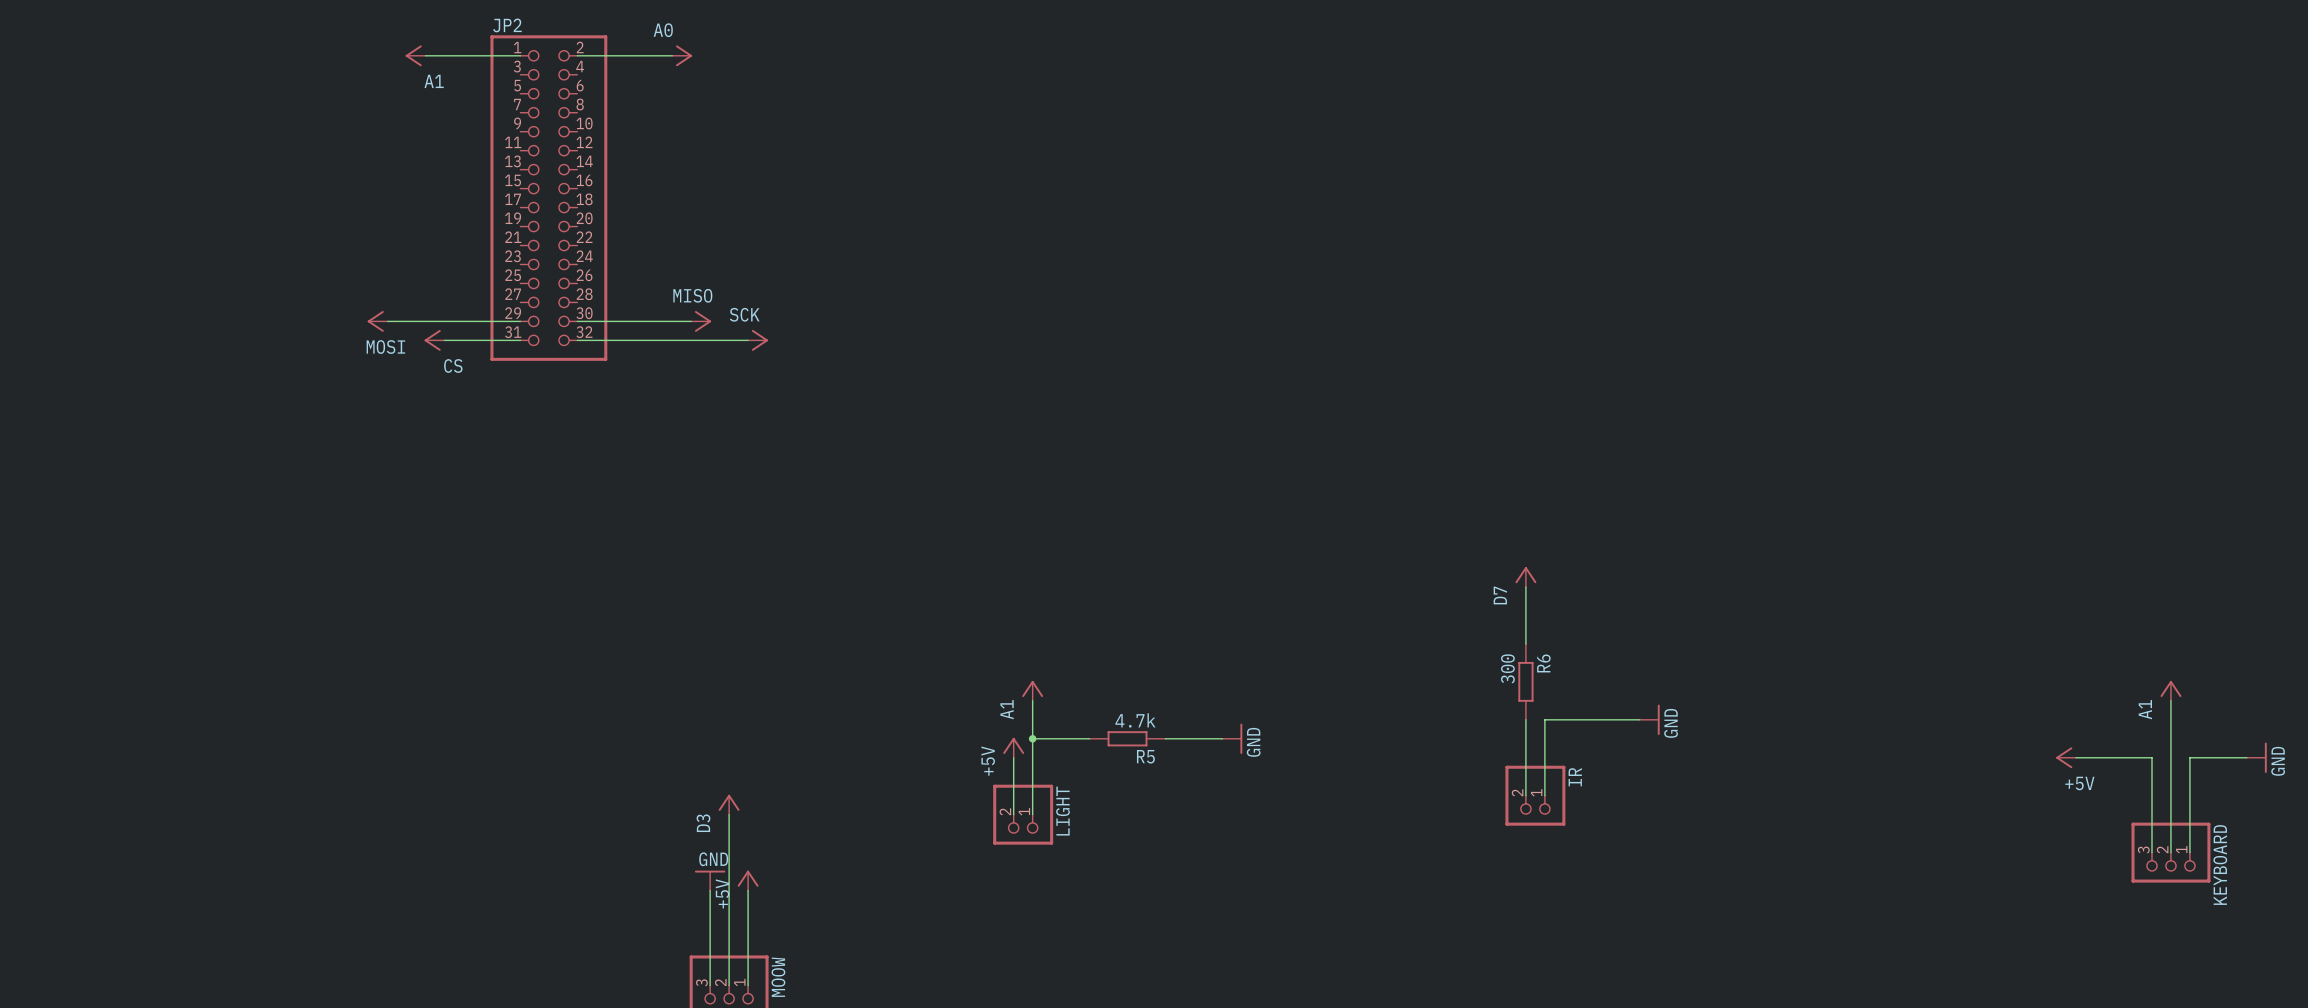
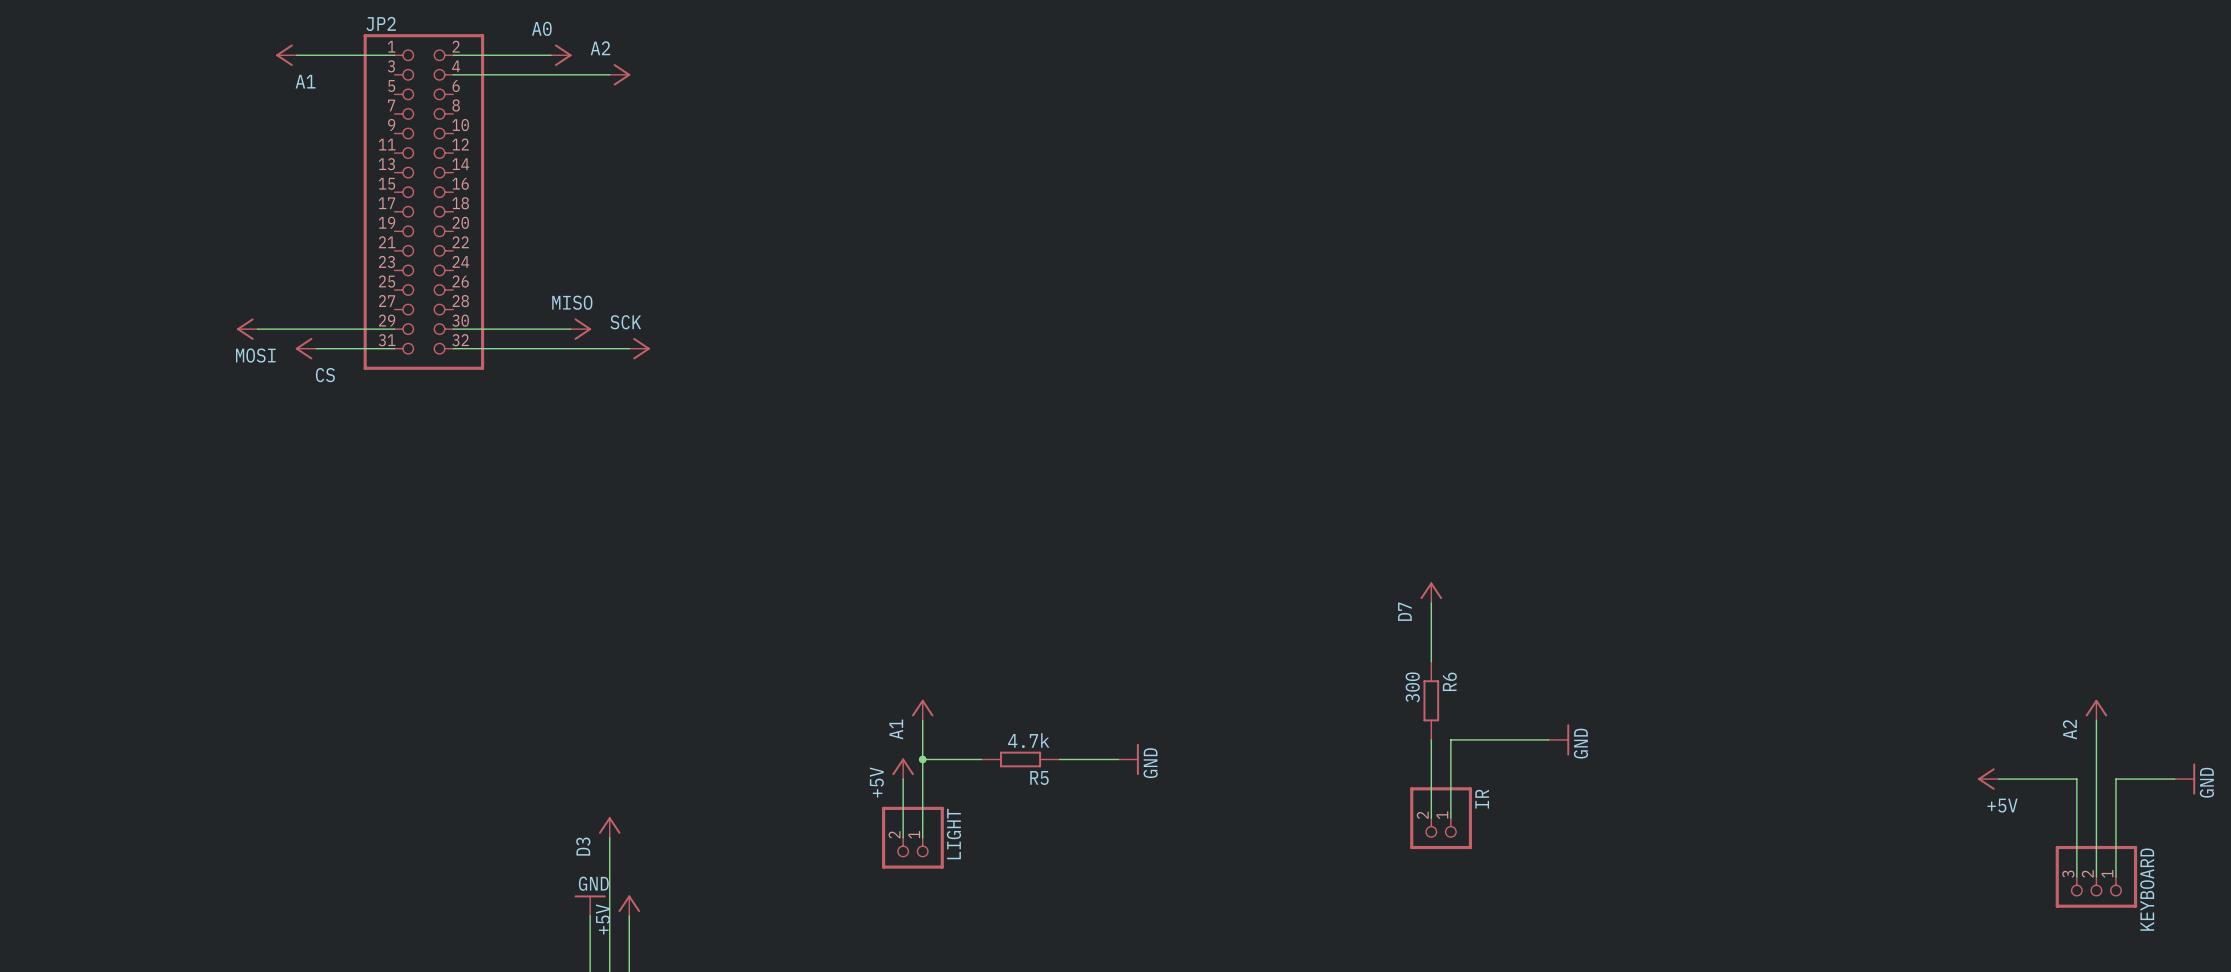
wire: none -> (453, 74) (609, 74)
power symbol: none -> A2 (619, 74)
power symbol: A1 (2170, 690) -> A2 (2096, 710)

